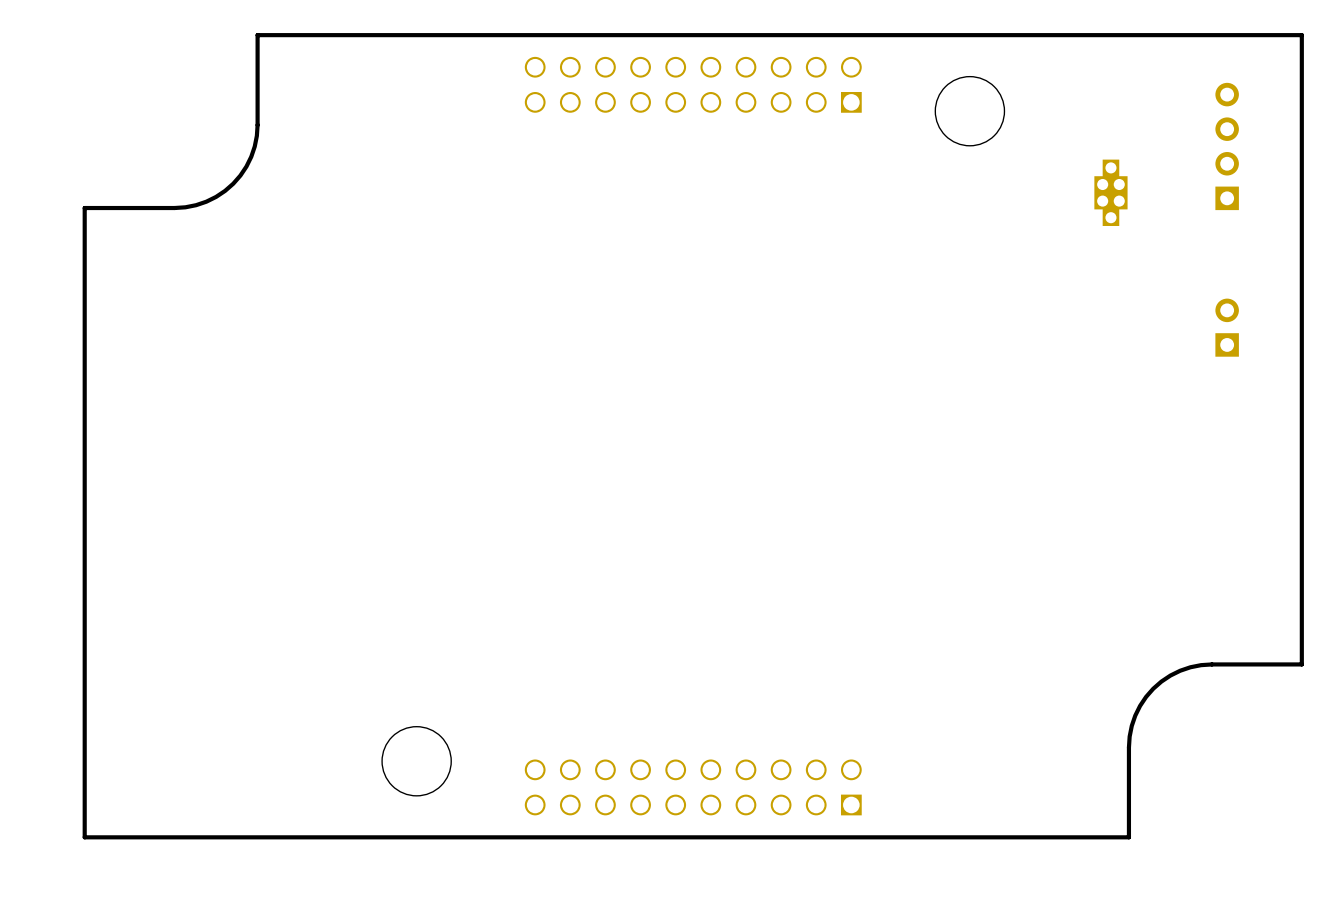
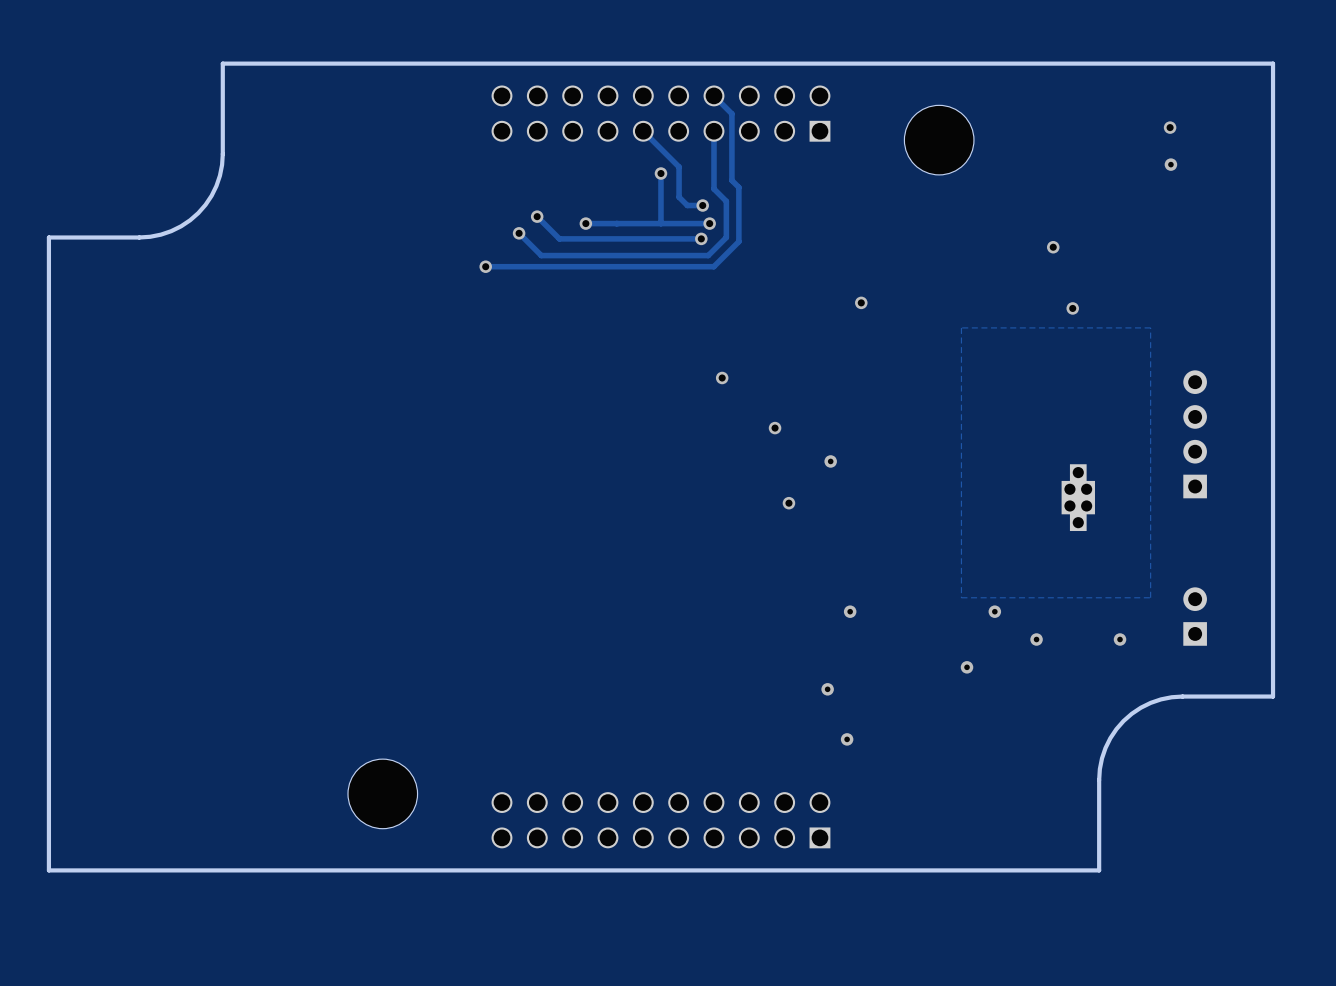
track: none -> (713, 95) (731, 113) (731, 180) (738, 187) (738, 241) (713, 266) (485, 266)
via: none -> (1170, 127)
track: none -> (643, 131) (679, 166) (679, 197) (687, 205) (702, 205)
track: none -> (713, 131) (713, 188) (726, 201) (726, 237) (708, 255) (541, 255) (519, 233)
via: none -> (1170, 164)
track: none -> (660, 173) (660, 223)
via: none -> (660, 173)
part position: (1227, 146) -> (1195, 434)
via: none -> (702, 205)
track: none -> (537, 216) (559, 238) (701, 238)
via: none -> (537, 216)
part position: (1110, 192) -> (1078, 497)
via: none -> (585, 223)
track: none -> (709, 223) (585, 223)
via: none -> (709, 223)
via: none -> (519, 233)
via: none -> (701, 238)
via: none -> (1053, 247)
via: none -> (485, 266)
via: none -> (861, 302)
via: none -> (1072, 308)
zone outline: none -> (1150, 327) (961, 327) (961, 597) (1150, 597) (1150, 327)
part position: (1227, 327) -> (1195, 616)
via: none -> (722, 377)
via: none -> (775, 428)
via: none -> (830, 461)
via: none -> (788, 503)
via: none -> (850, 611)
via: none -> (994, 611)
via: none -> (1036, 639)
via: none -> (1120, 639)
via: none -> (967, 667)
via: none -> (827, 689)
via: none -> (847, 739)

